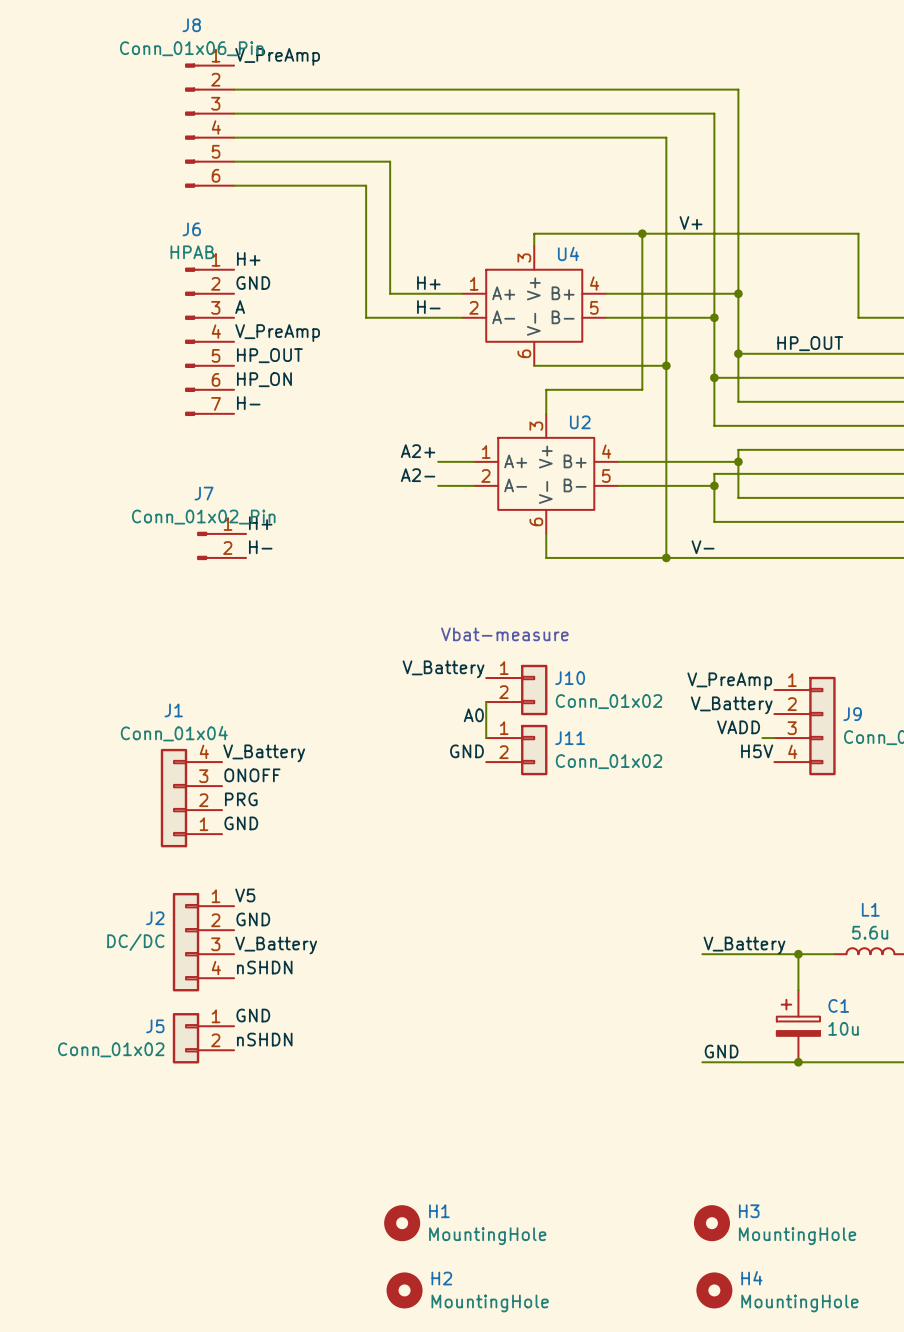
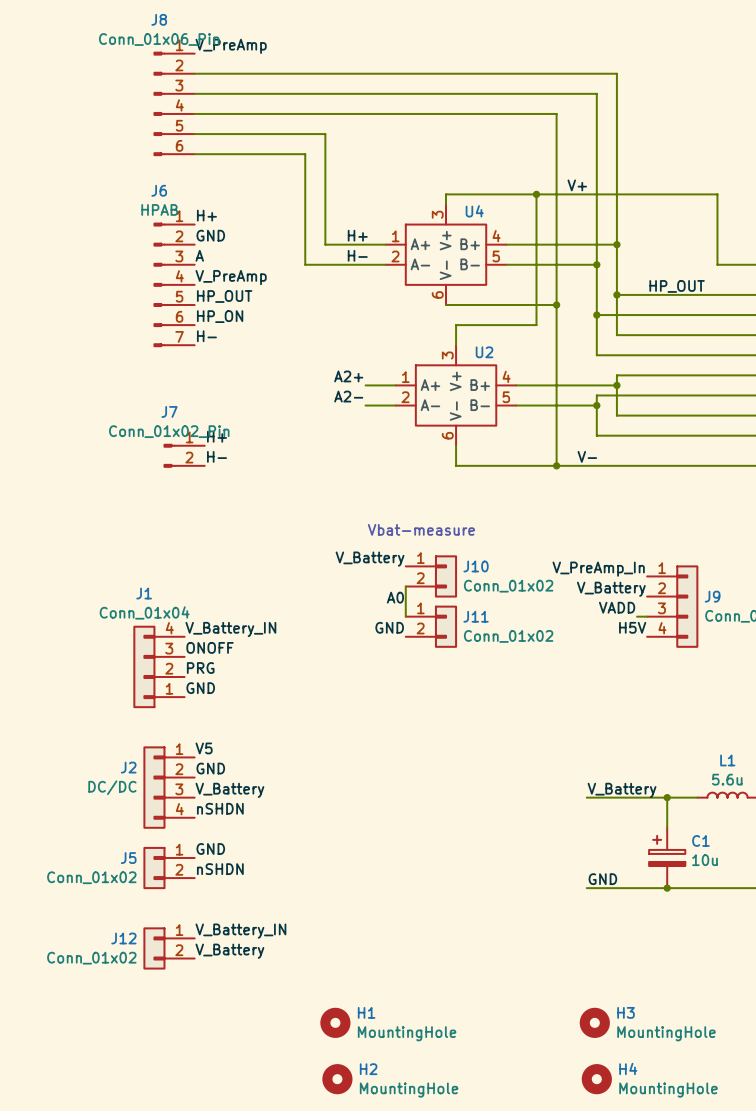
label: V_PreAmp (729, 681) -> V_PreAmp_In (598, 569)
label: V_Battery (264, 753) -> V_Battery_IN (230, 629)
label: none -> V_Battery_IN (240, 931)
J12: none -> Conn_01x02 (169, 948)
label: none -> V_Battery (229, 951)

